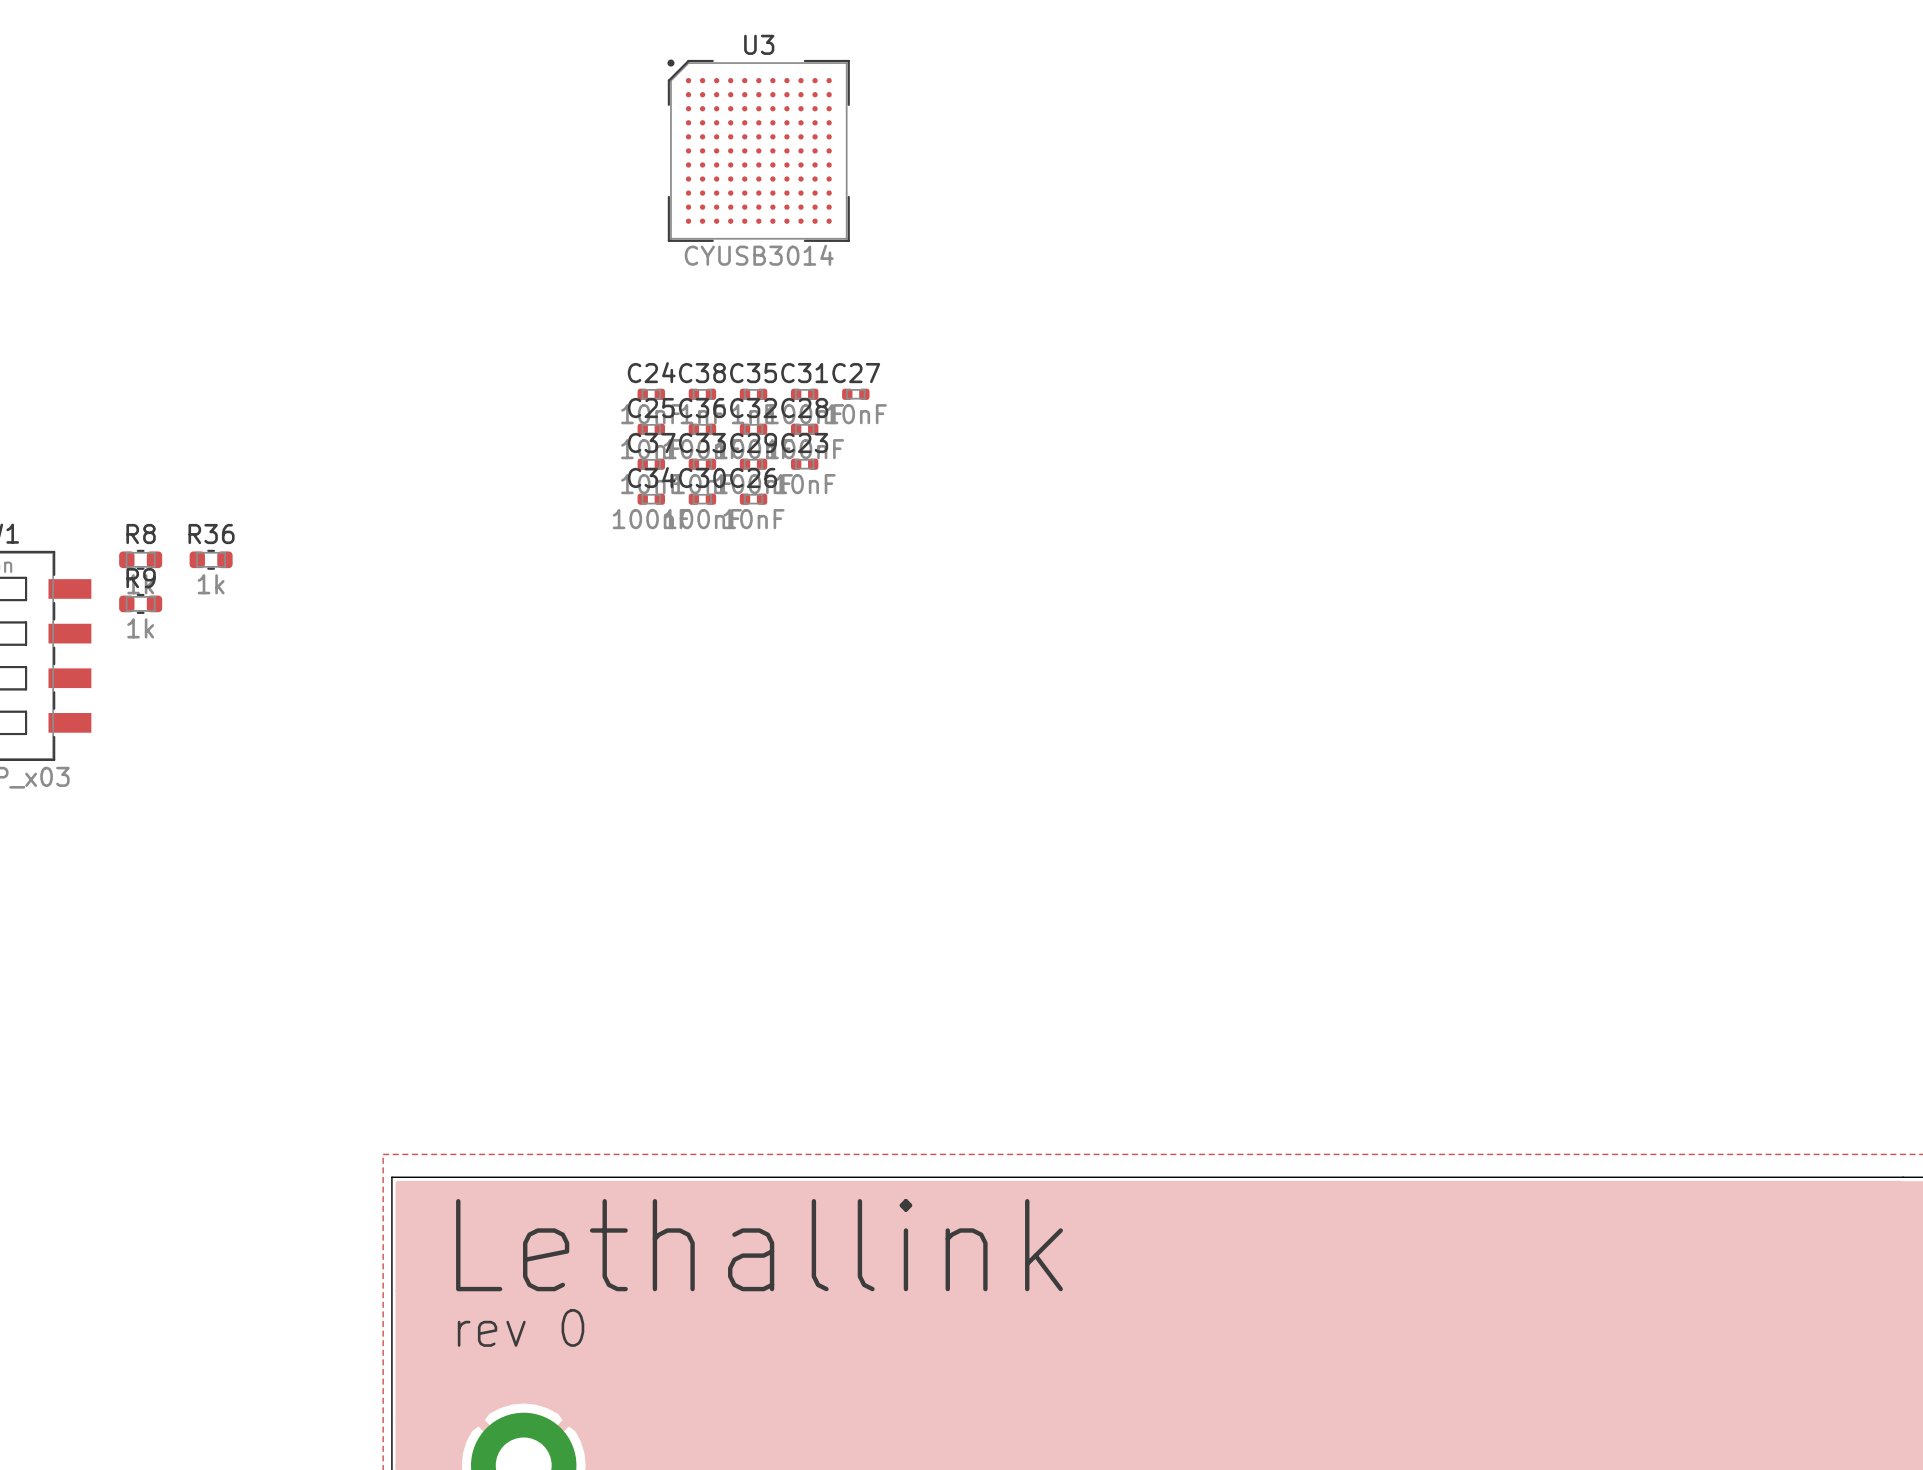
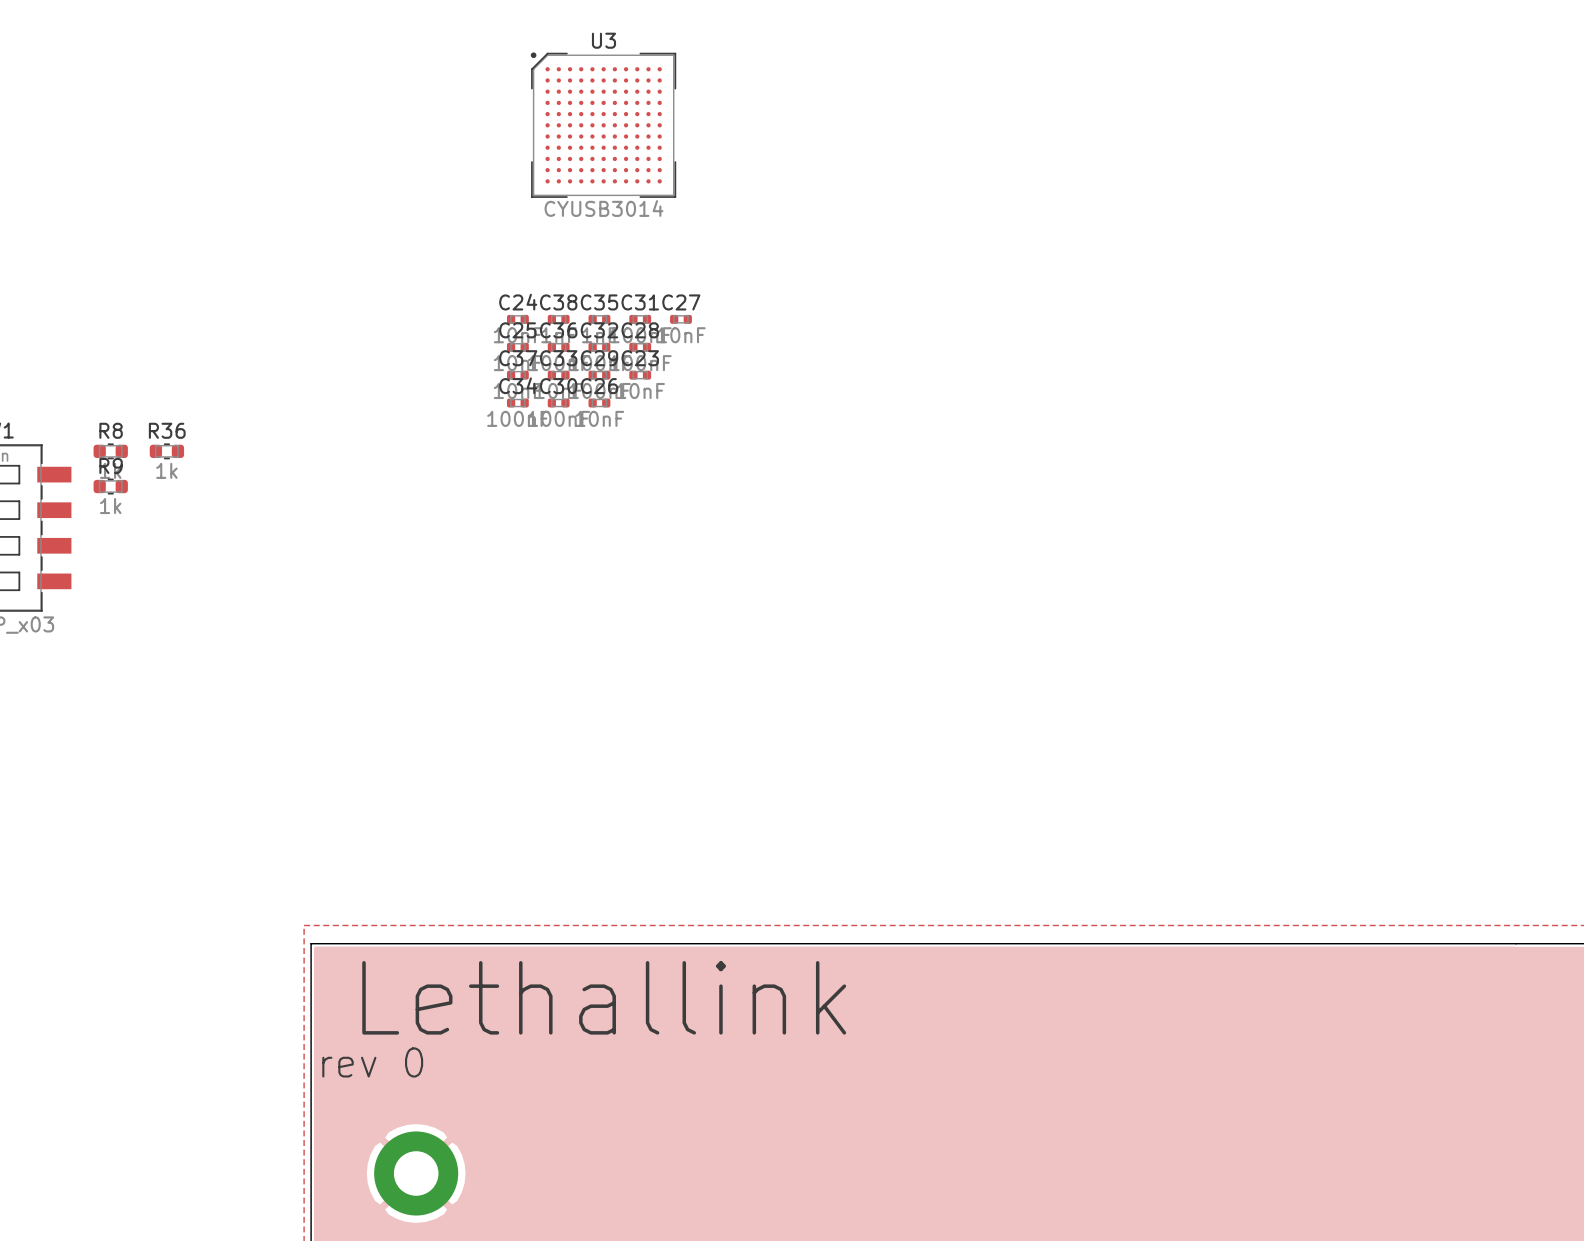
text position: rev 0 (521, 1327) -> rev 0 (372, 1062)

